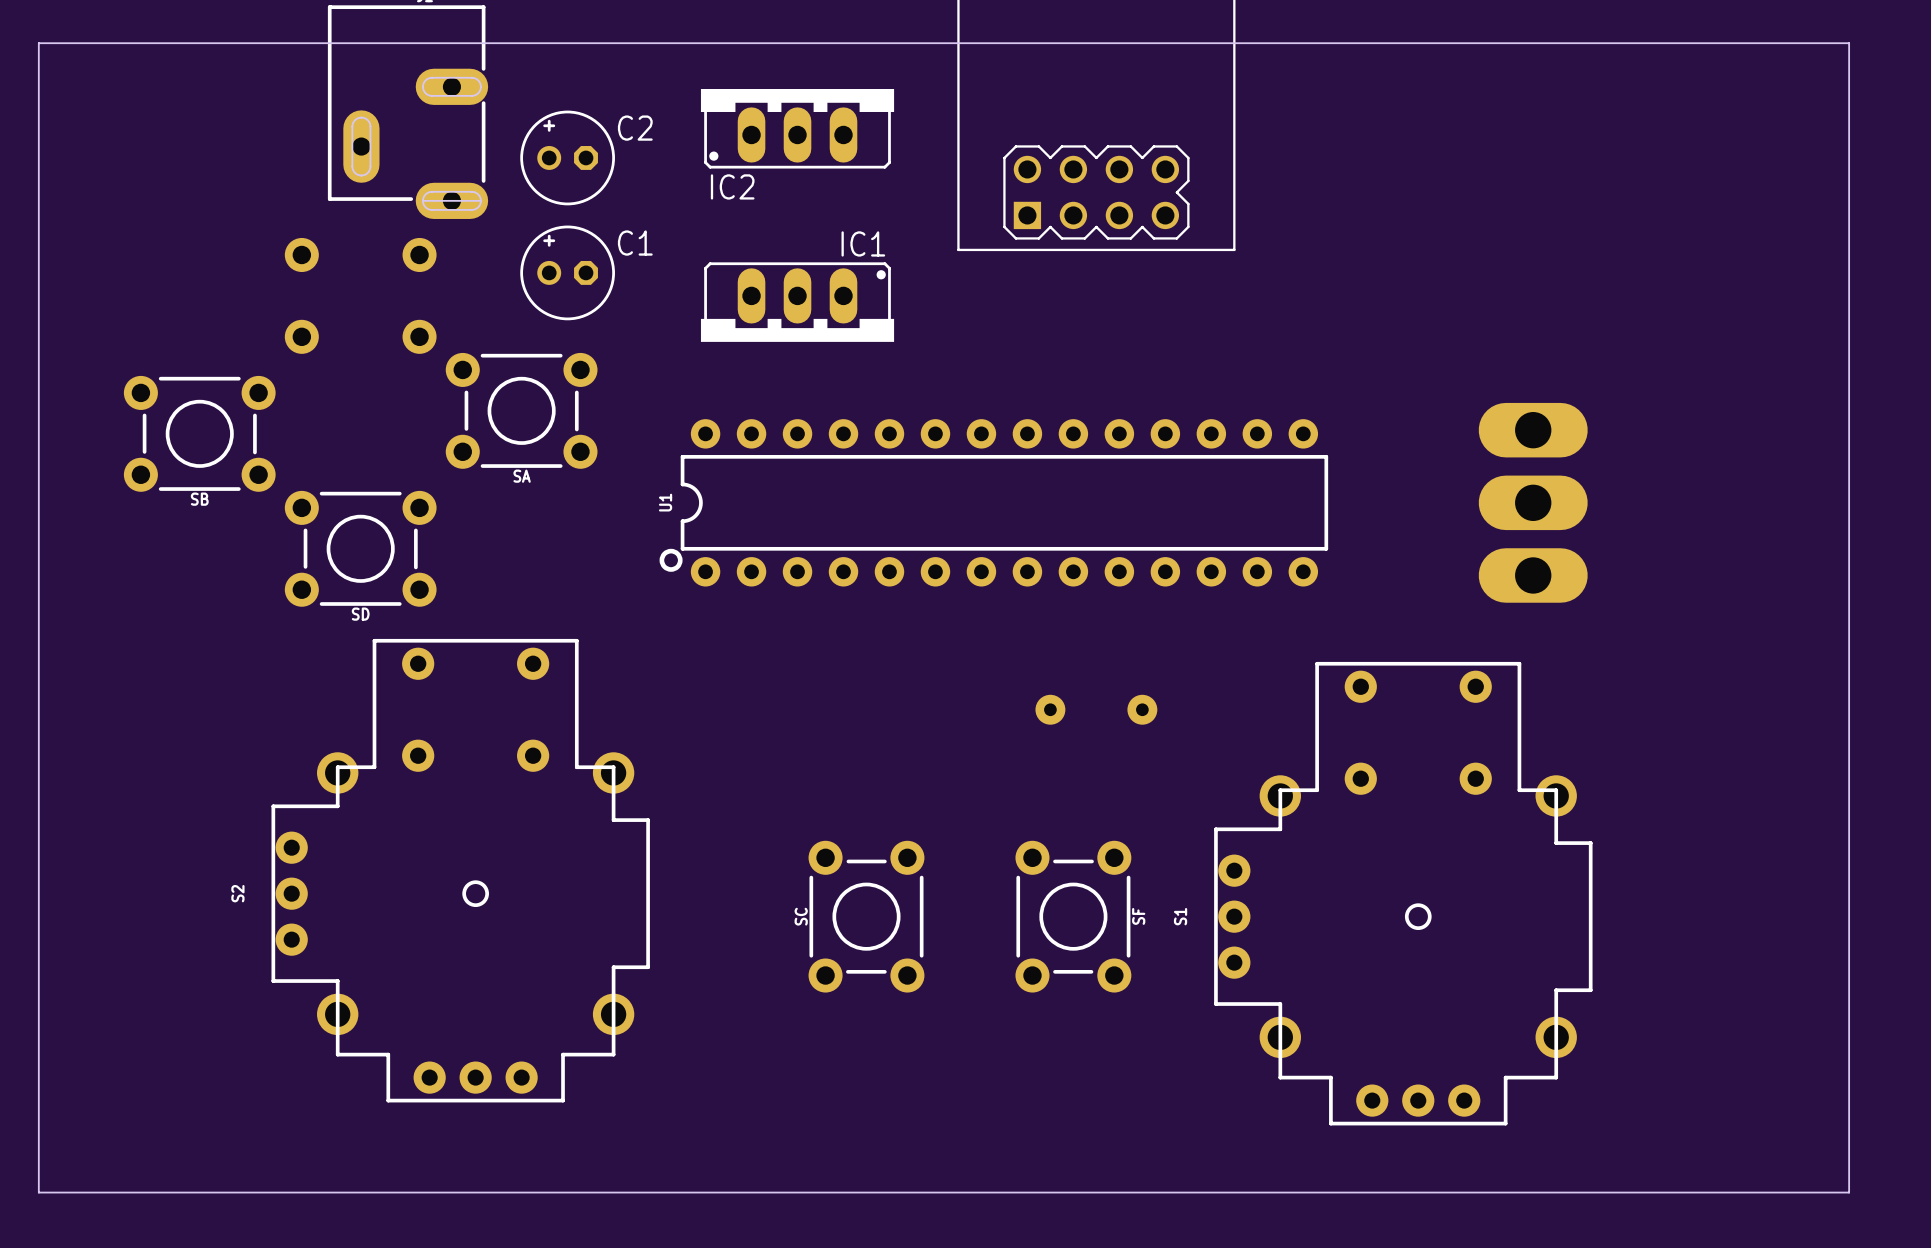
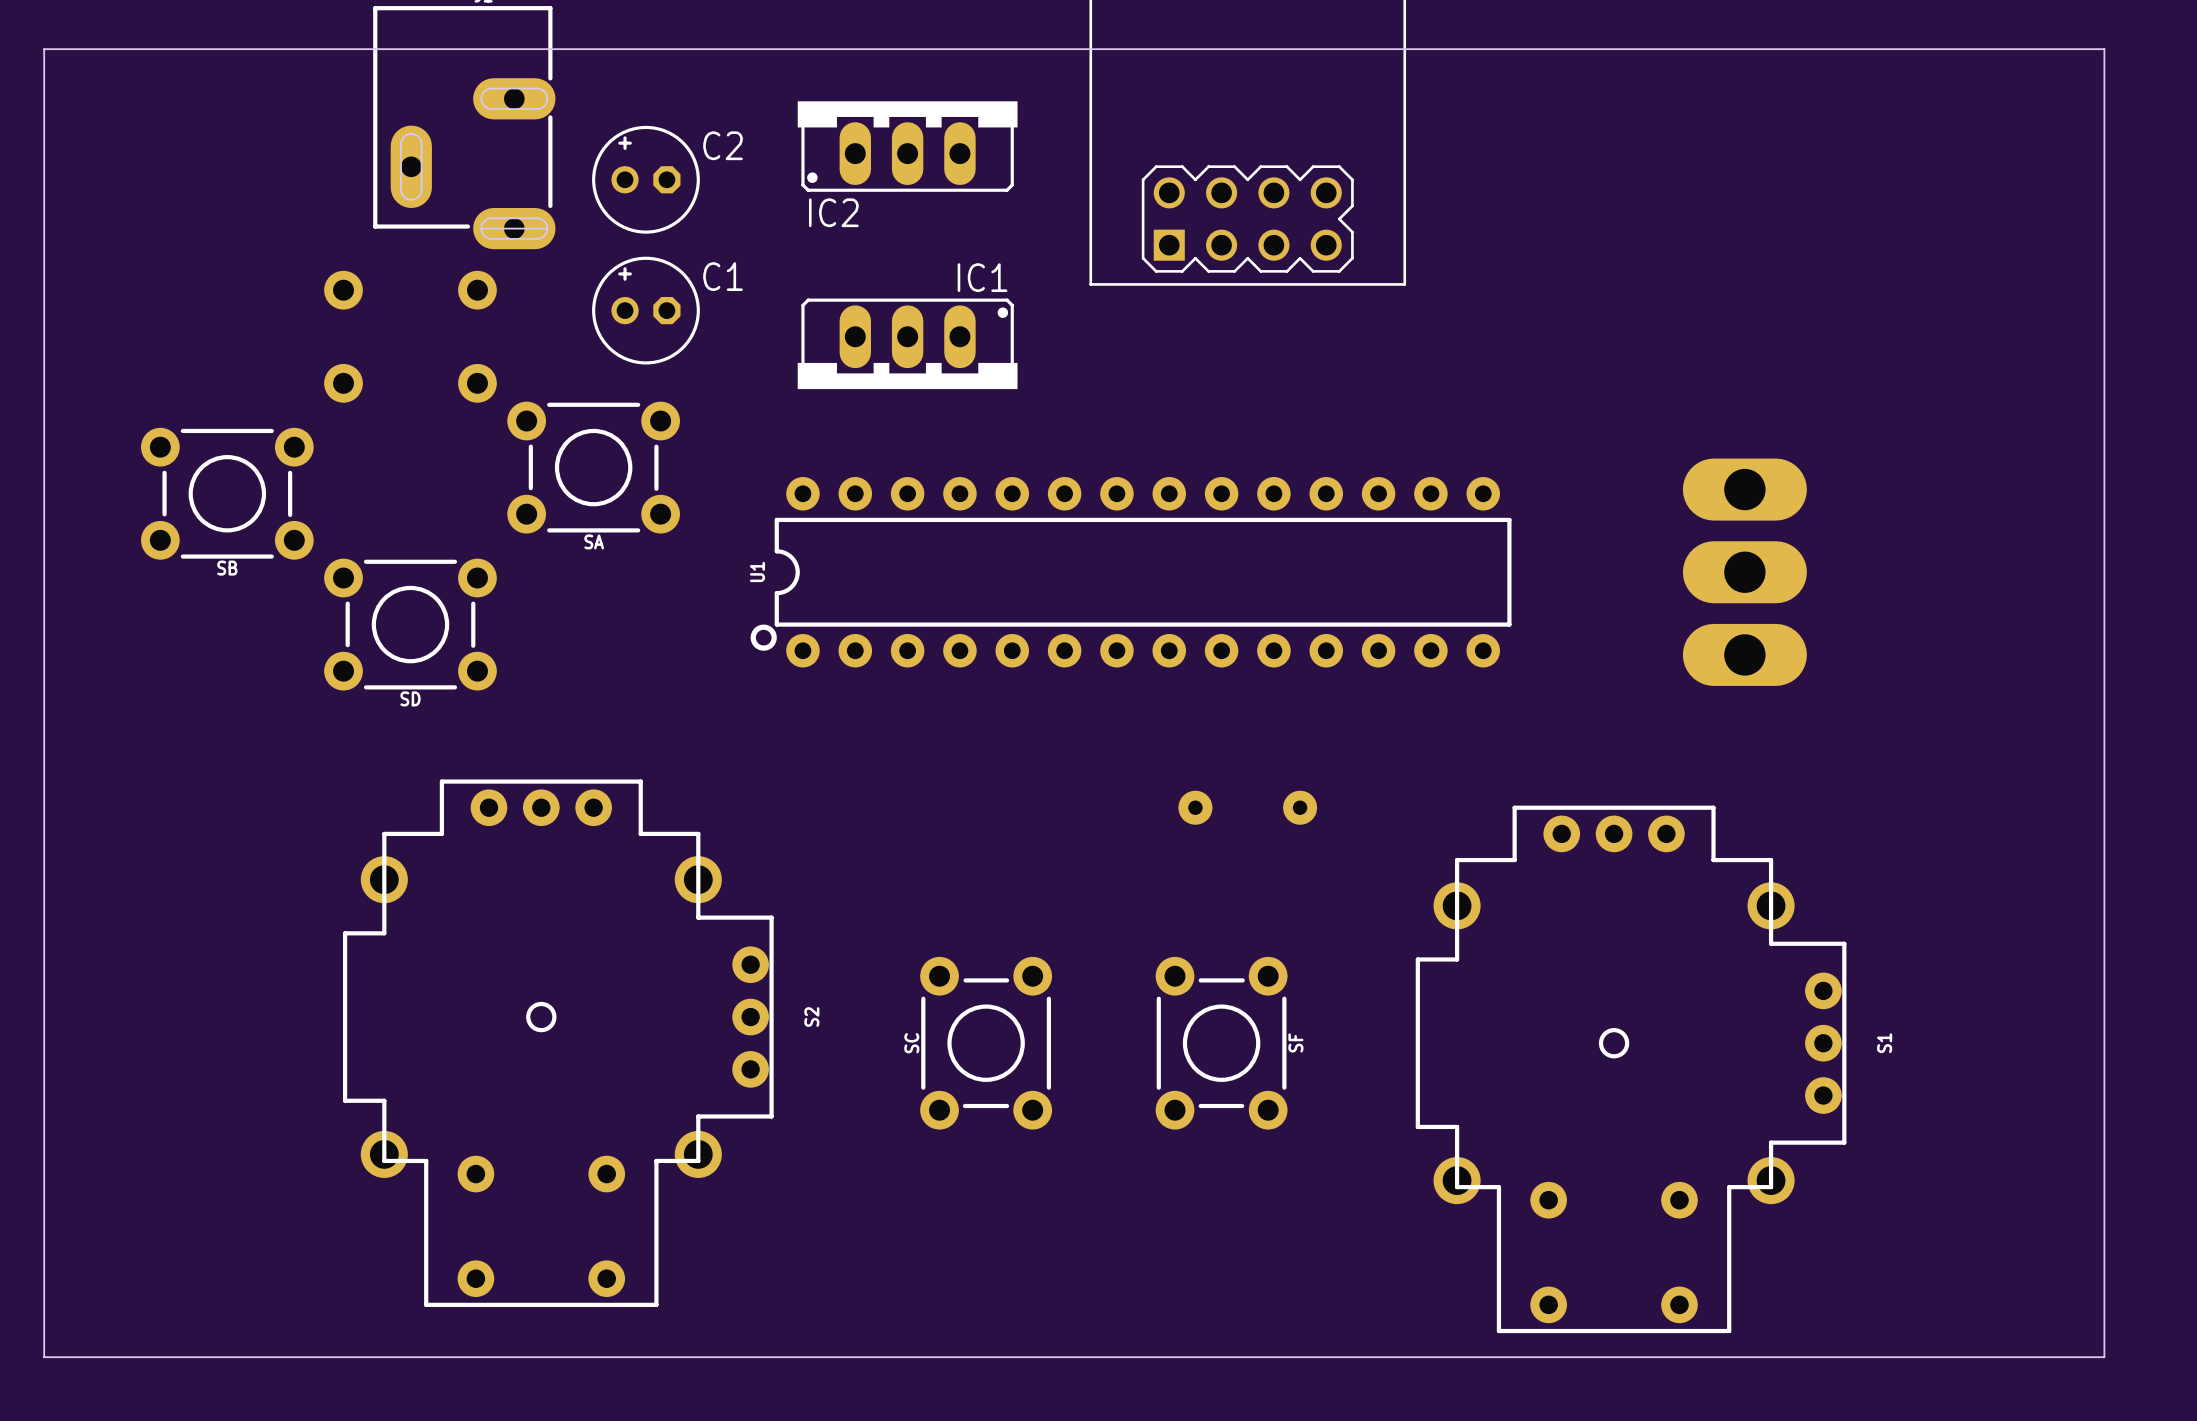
S2 rotation: 0° (460, 870) -> 180° (558, 1043)
S1 rotation: 0° (1403, 893) -> 180° (1631, 1069)

